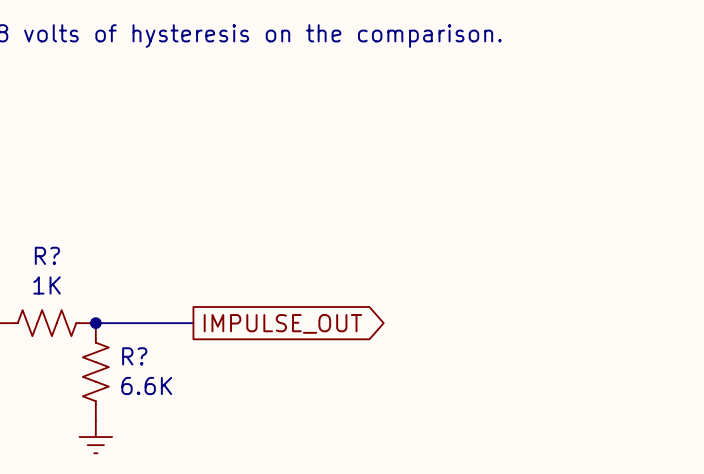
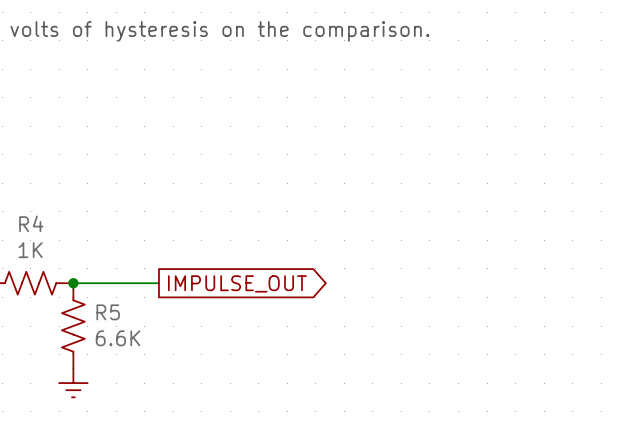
R? name: R? (47, 255) -> R4 (31, 223)
R? name: R? (134, 356) -> R5 (108, 312)

